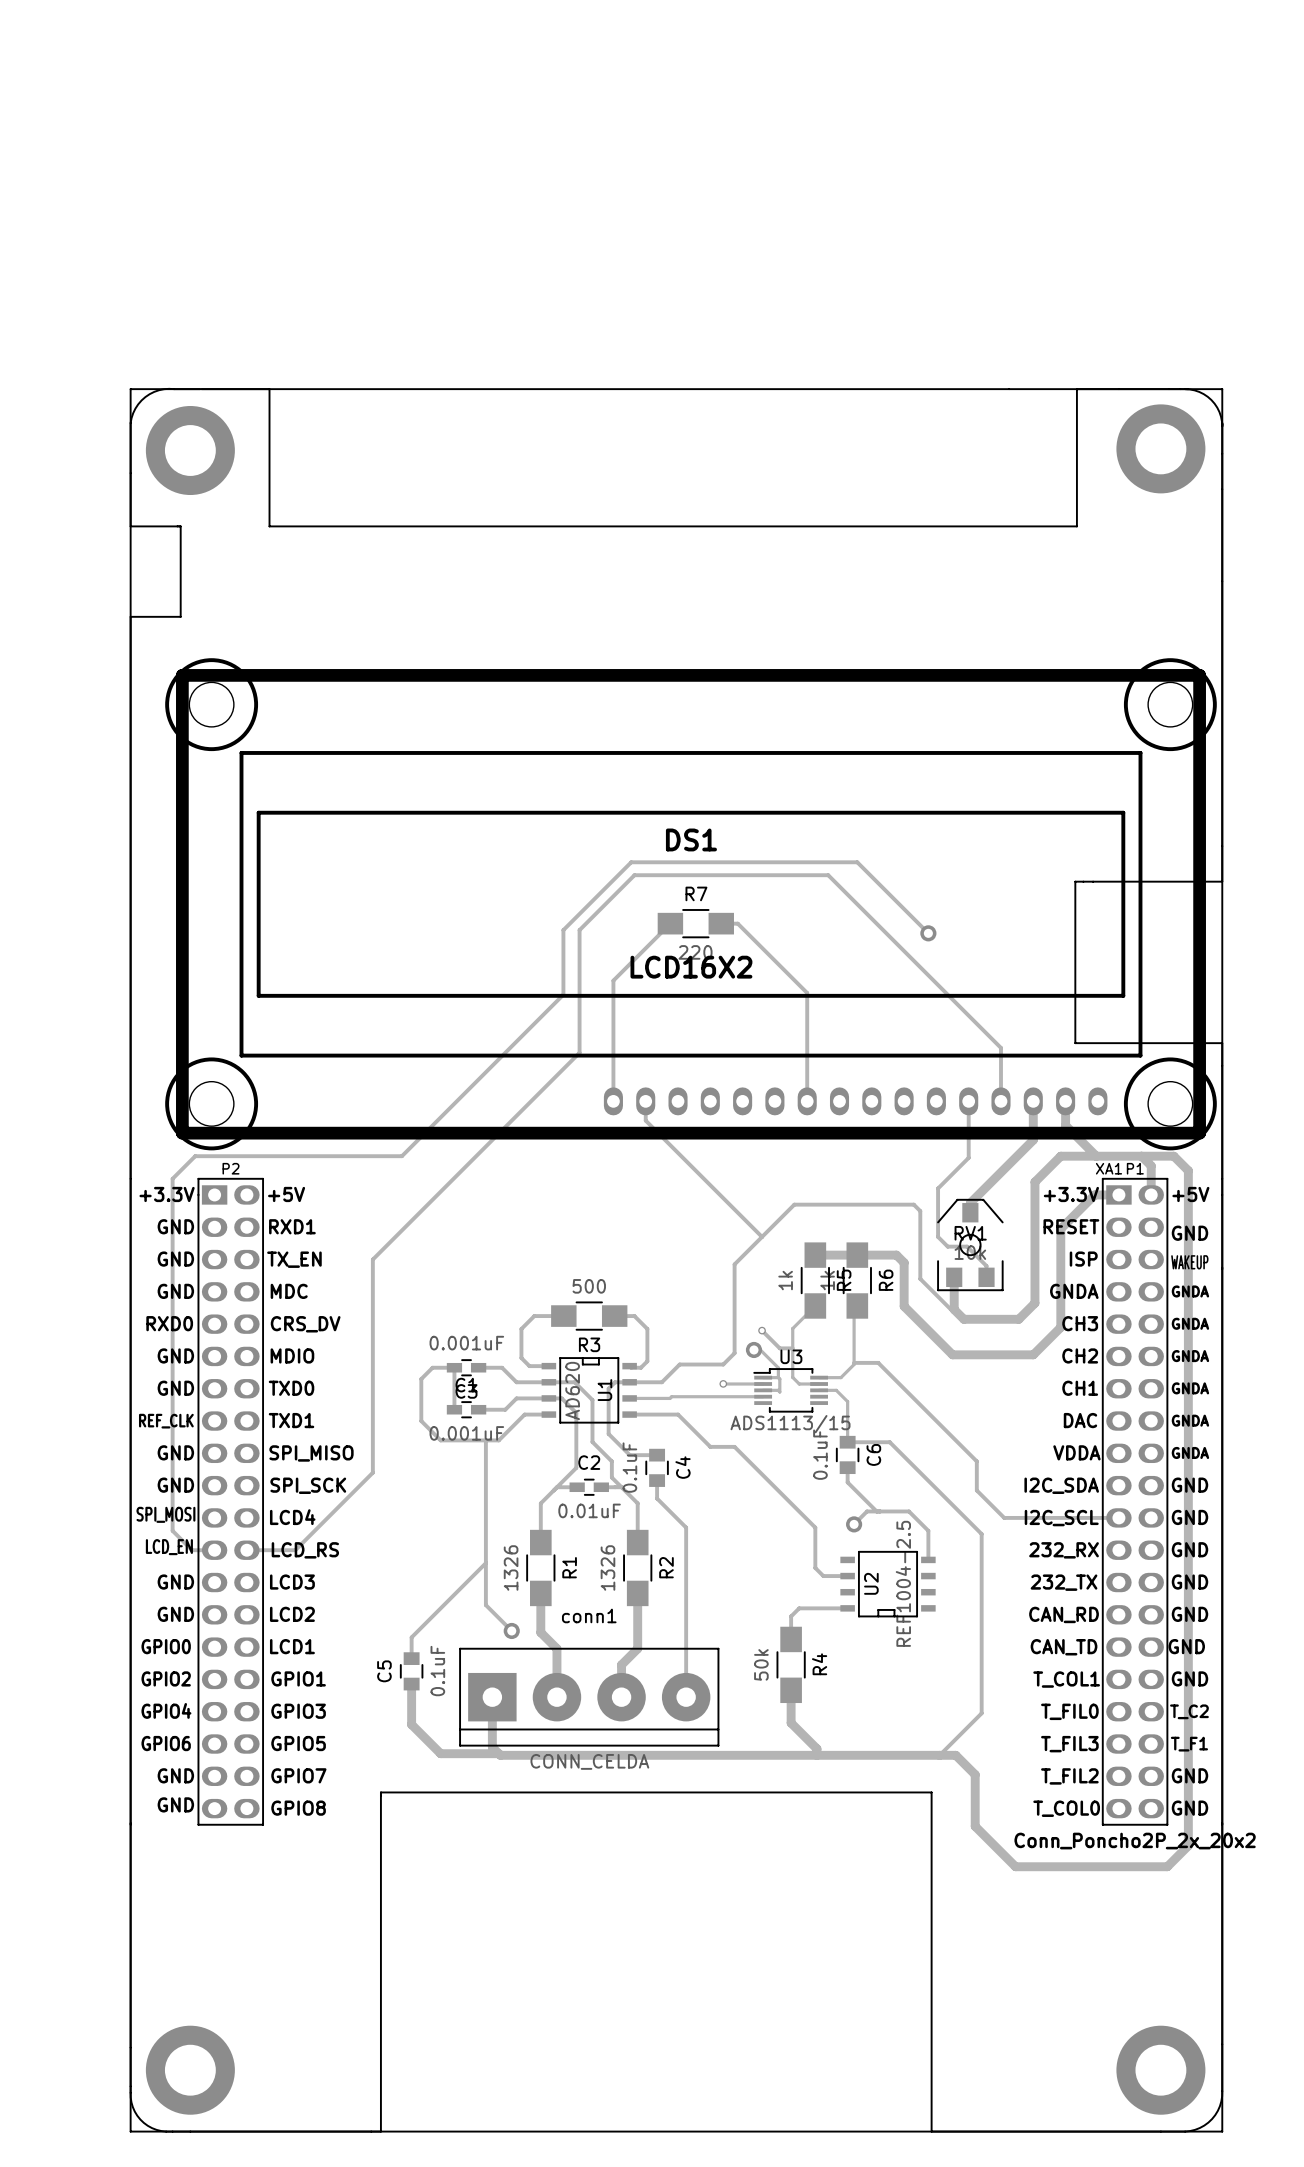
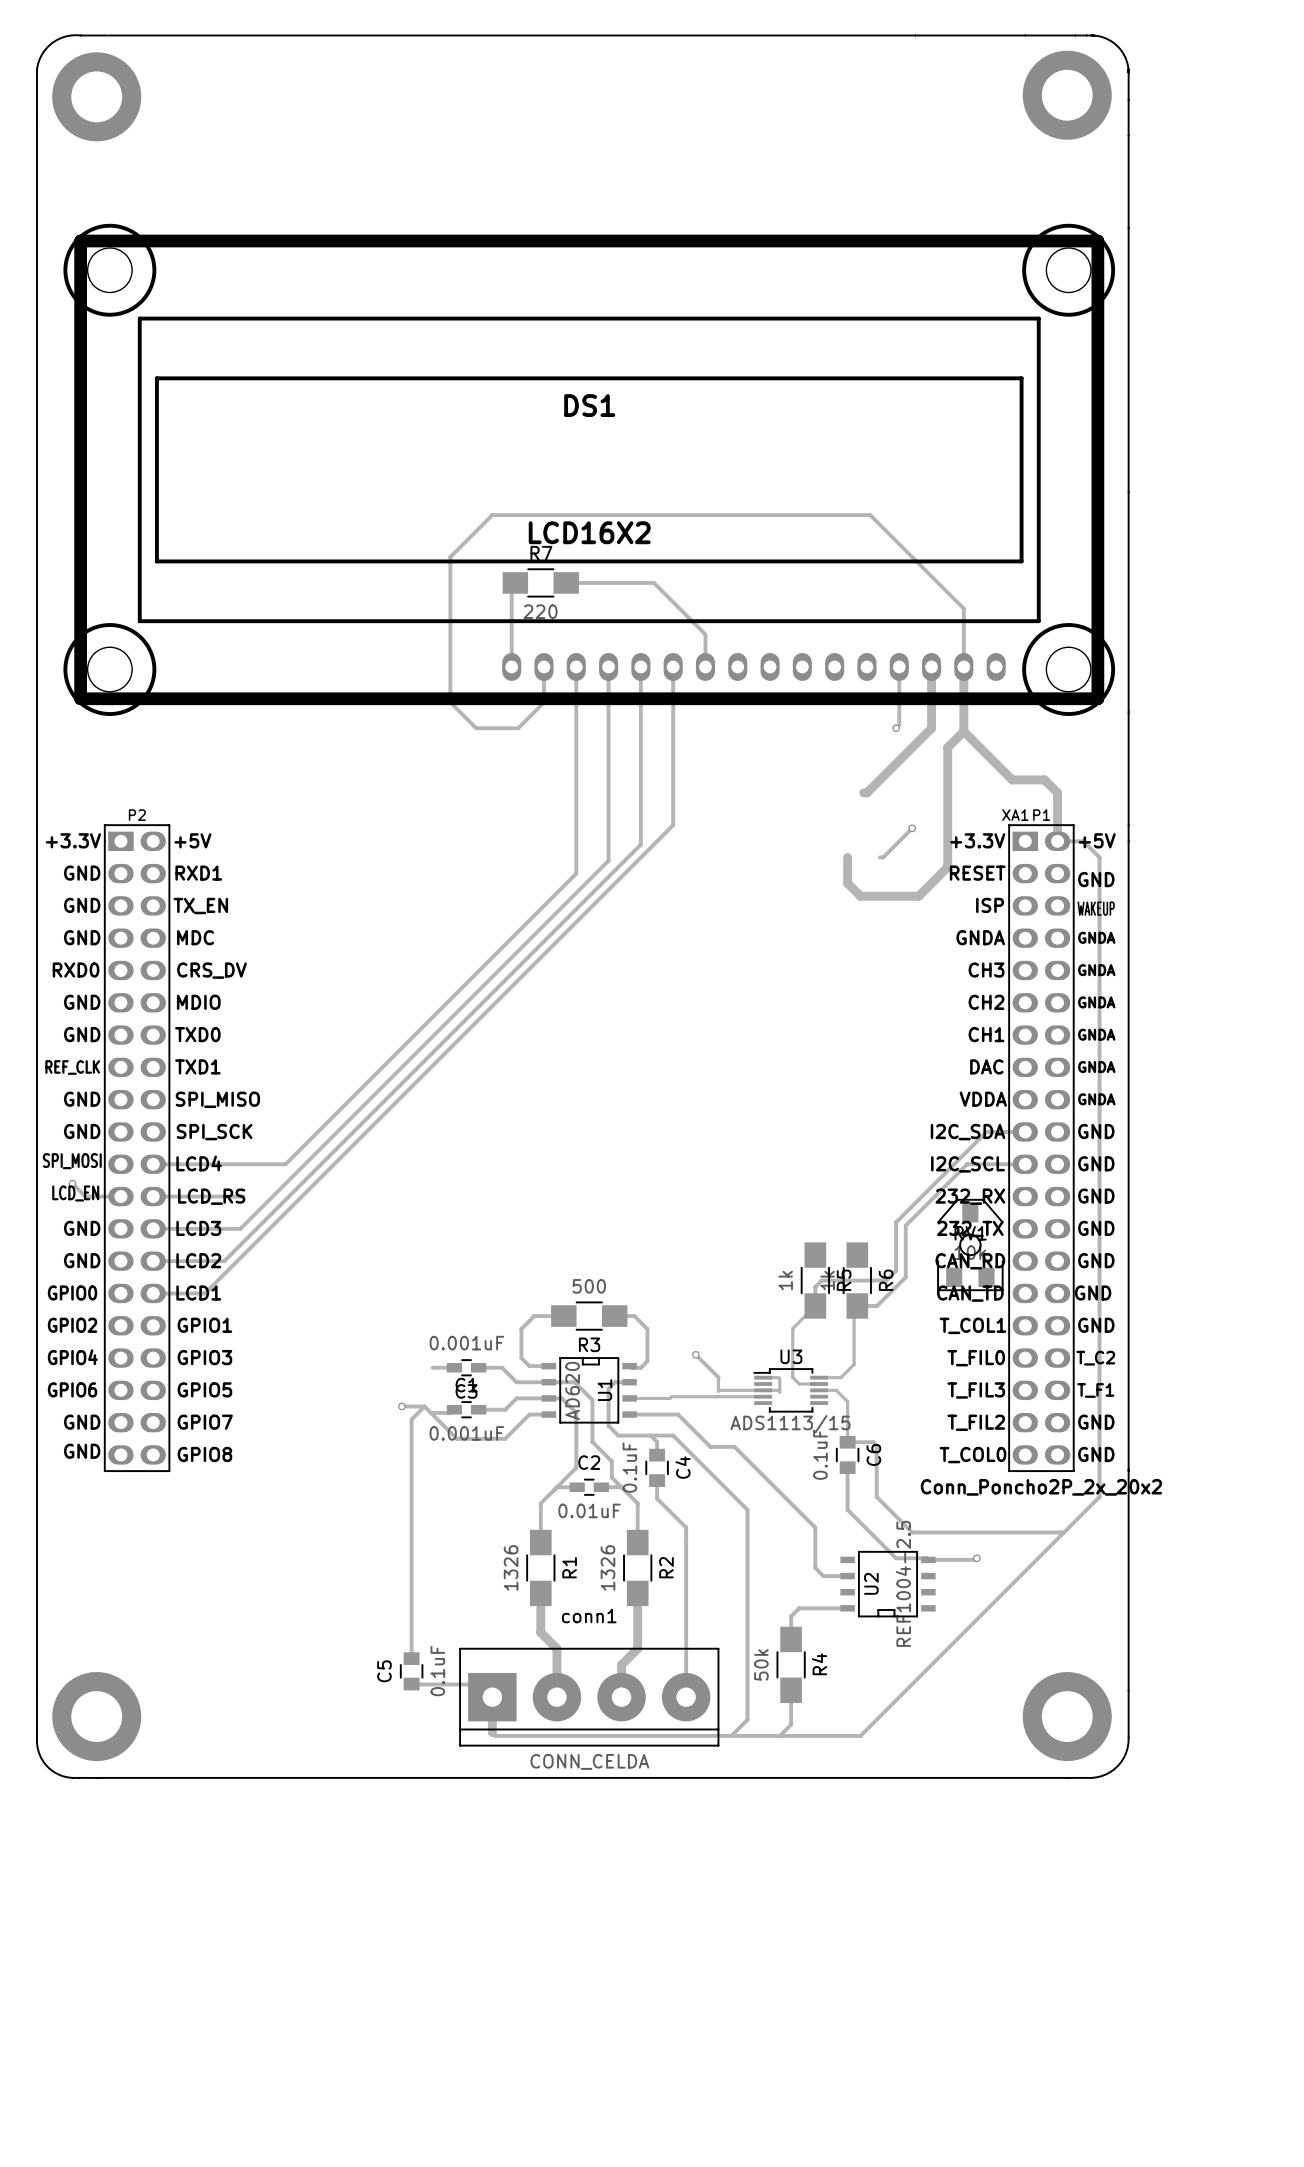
board edge: (130, 389) (130, 526) (180, 526) (180, 616) (130, 616) (130, 2131) (380, 2131) (380, 1792) (931, 1792) (931, 2131) (1222, 2131) (1222, 1043) (1075, 1043) (1075, 881) (1222, 881) (1222, 389) (1076, 389) (1076, 526) (269, 526) (269, 389) (130, 389) -> none
track: none -> (515, 582) (511, 586) (511, 666)
track: none -> (566, 582) (653, 582) (705, 634) (705, 666)
track: none -> (543, 666) (543, 702) (518, 728) (476, 728) (450, 702) (450, 557) (492, 515) (870, 515) (963, 608) (963, 731)
track: none -> (576, 666) (576, 873) (285, 1164) (153, 1164)
track: none -> (608, 666) (608, 860) (240, 1228) (153, 1228)
track: none -> (640, 666) (640, 844) (224, 1261) (153, 1261)
track: none -> (673, 666) (673, 825) (204, 1293) (153, 1293)
track: none -> (899, 666) (899, 725) (896, 728)
track: none -> (931, 666) (931, 728) (867, 792) (863, 792)
via: none -> (896, 728)
track: none -> (963, 731) (947, 747) (947, 867) (918, 896) (860, 896) (847, 883) (847, 857)
track: none -> (912, 828) (883, 857) (879, 857)
via: none -> (912, 828)
DS1 position: (690, 904) -> (589, 469)
track: (670, 923) (613, 980) (613, 1101) -> none
R7 position: (695, 923) -> (540, 582)
track: (721, 923) (737, 923) (807, 993) (807, 1101) -> none
track: (928, 933) (857, 862) (631, 862) (563, 930) (563, 994) (401, 1156) (195, 1156) (172, 1178) (172, 1530) (192, 1550) (214, 1550) -> none
via: (928, 933) -> none
track: (645, 1101) (645, 1120) (762, 1236) -> none
track: (968, 1101) (968, 1157) (938, 1188) (938, 1236) (947, 1246) (967, 1246) (986, 1266) (986, 1277) -> none
track: (1000, 1101) (1000, 1047) (828, 875) (634, 875) (579, 930) (579, 1052) (372, 1259) (372, 1472) (295, 1550) (246, 1550) -> none
track: (1033, 1101) (1033, 1140) (970, 1203) (970, 1212) -> none
track: (1065, 1101) (1065, 1125) (1096, 1156) -> none
track: none -> (1025, 1131) (986, 1131) (896, 1222) (896, 1270) (886, 1280) (821, 1280) (815, 1287) (815, 1305)
track: (1141, 1156) (1151, 1165) (1151, 1194) -> none
track: none -> (1025, 1164) (967, 1164) (905, 1225) (905, 1277) (877, 1305) (857, 1305)
track: none -> (72, 1183) (85, 1196) (120, 1196)
via: none -> (72, 1183)
track: (1118, 1194) (1094, 1194) (1060, 1228) (1060, 1327) (1033, 1354) (952, 1354) (904, 1306) (904, 1262) (896, 1255) (815, 1255) -> none
track: none -> (153, 1196) (243, 1196)
XA1 position: (676, 1260) -> (582, 906)
track: (954, 1277) (954, 1309) -> none
track: (954, 1309) (963, 1319) (1018, 1319) (1034, 1303) (1034, 1182) (1060, 1156) (1173, 1156) (1188, 1170) (1188, 1845) (1167, 1866) (1015, 1866) (975, 1826) (975, 1774) (955, 1755) (500, 1755) (492, 1747) (492, 1732) -> (963, 731) (1012, 779) (1044, 779) (1057, 792) (1057, 841) (1083, 841) (1099, 857) (1099, 1496) (860, 1735) (495, 1735) (492, 1732)
track: (954, 1309) (950, 1309) (920, 1278) (920, 1211) (913, 1204) (794, 1204) (734, 1264) (734, 1353) (723, 1364) (679, 1364) (661, 1382) (629, 1382) -> none
track: (762, 1330) (779, 1348) (792, 1348) -> none
via: (762, 1330) -> none
track: (753, 1349) (760, 1349) (778, 1367) (778, 1377) -> none
via: (753, 1349) -> none
track: none -> (695, 1354) (718, 1377) (718, 1390) (763, 1390)
via: none -> (695, 1354)
track: (854, 1362) (878, 1362) (976, 1461) (976, 1490) (1004, 1517) (1118, 1517) -> none
track: (432, 1367) (421, 1379) (421, 1421) (440, 1440) (498, 1440) (524, 1414) (529, 1414) -> (424, 1406) (456, 1438) (505, 1438) (529, 1414)
track: (454, 1367) (454, 1409) -> (431, 1412) (451, 1412) (454, 1409)
track: (723, 1383) (763, 1383) -> none
via: (723, 1383) -> none
track: none -> (401, 1406) (424, 1406)
via: none -> (401, 1406)
track: (608, 1425) (608, 1433) (629, 1455) (657, 1455) -> (650, 1435) (657, 1442) (657, 1455)
track: none -> (608, 1425) (618, 1435) (673, 1435) (747, 1509) (747, 1719) (731, 1735)
track: (485, 1440) (485, 1605) (511, 1630) -> none
track: (873, 1442) (889, 1442) (981, 1534) (981, 1713) (939, 1755) -> (873, 1442) (876, 1445) (876, 1496) (912, 1532) (1064, 1532)
track: (847, 1482) (876, 1511) -> (847, 1482) (847, 1509) (896, 1558) (926, 1558) (928, 1559) (975, 1559) (976, 1558)
track: (854, 1524) (867, 1511) (909, 1511) (928, 1530) (928, 1559) -> none
via: (854, 1524) -> none
via: none -> (976, 1558)
track: (485, 1563) (411, 1637) -> (424, 1406) (411, 1419) (411, 1637)
via: (511, 1630) -> none
track: (411, 1684) (411, 1724) (440, 1753) (498, 1753) -> (411, 1684) (479, 1684) (492, 1697)
track width: thick (791, 1690) (791, 1723) -> thin (791, 1690) (791, 1723)
track: (791, 1723) (816, 1748) (816, 1755) -> (791, 1723) (779, 1735)

